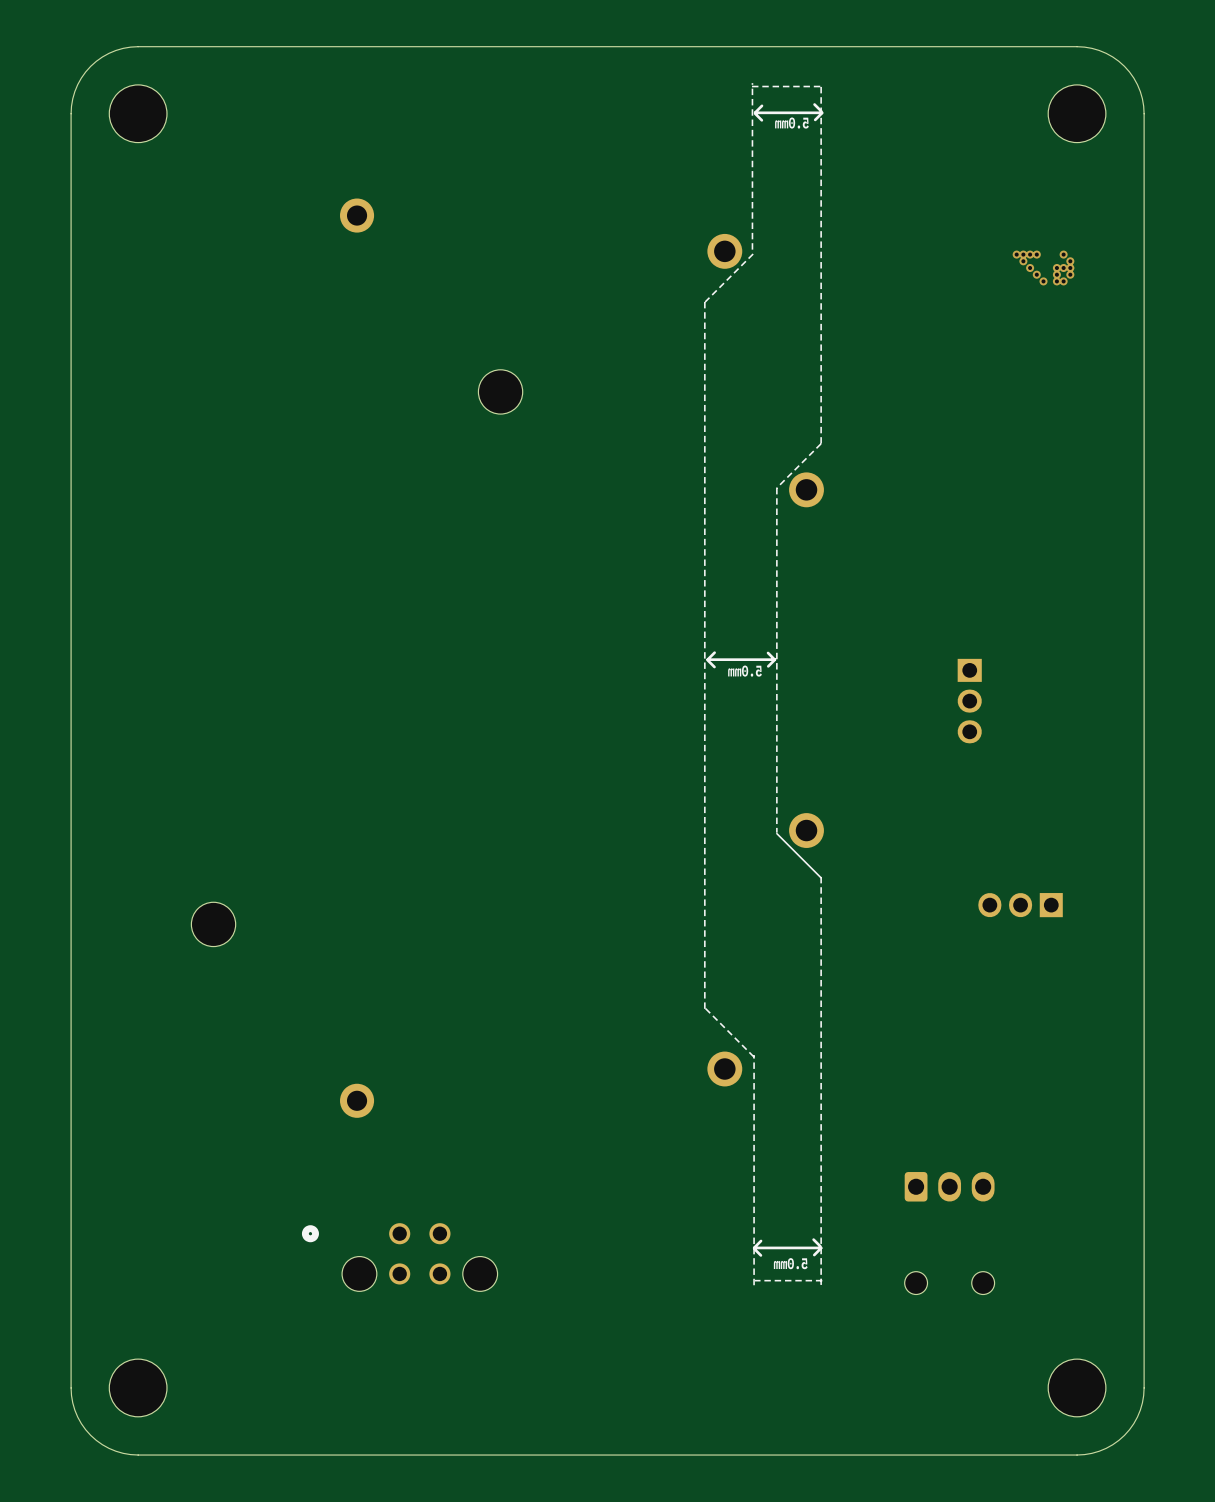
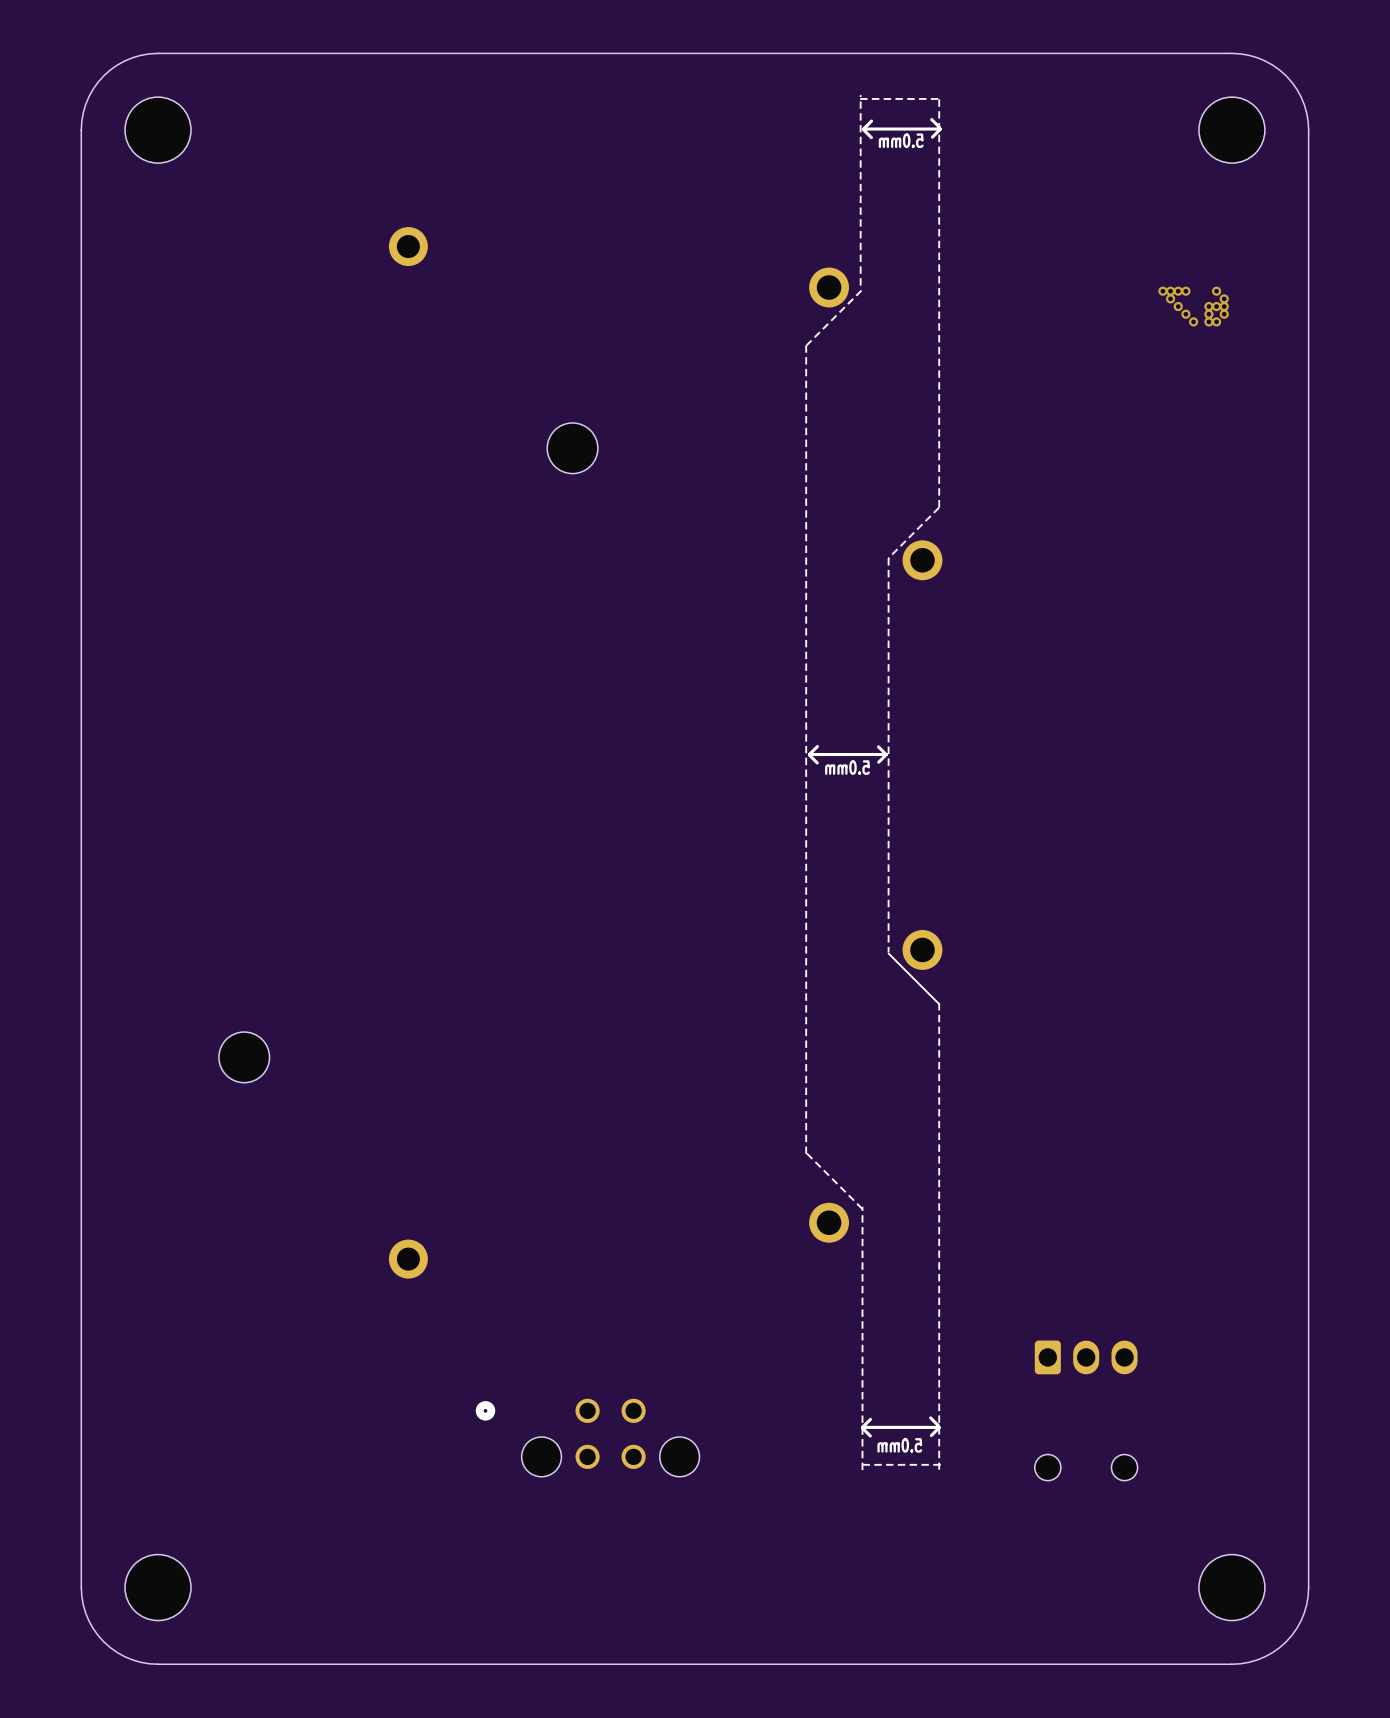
part: (969, 701) -> none
part: (1020, 905) -> none
part position: (399, 1257) -> (587, 1437)

